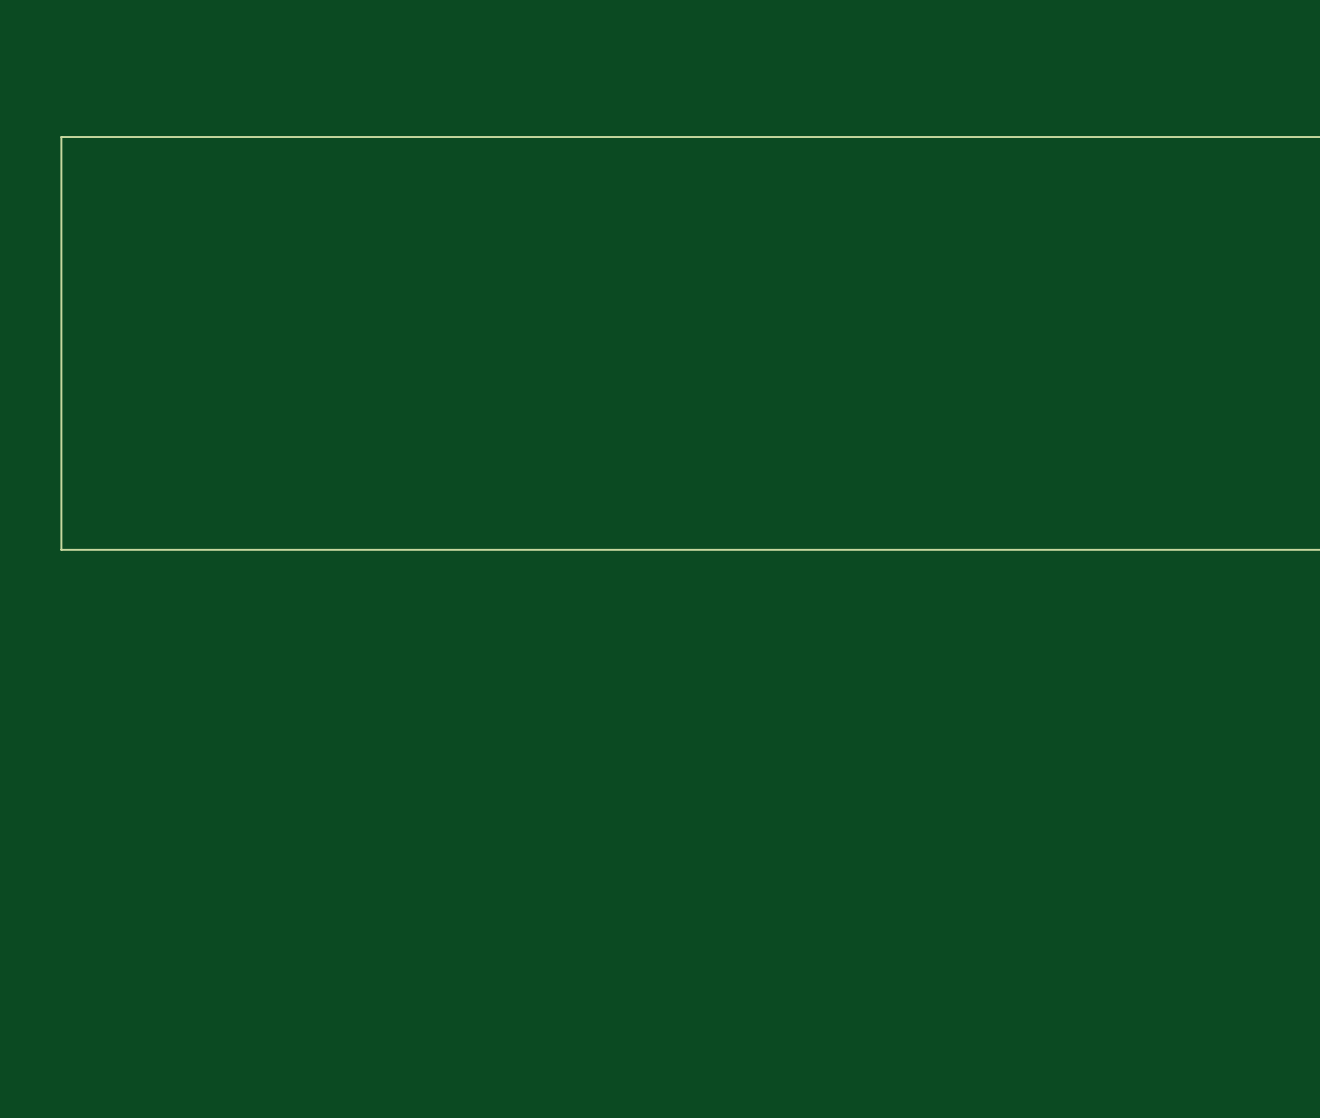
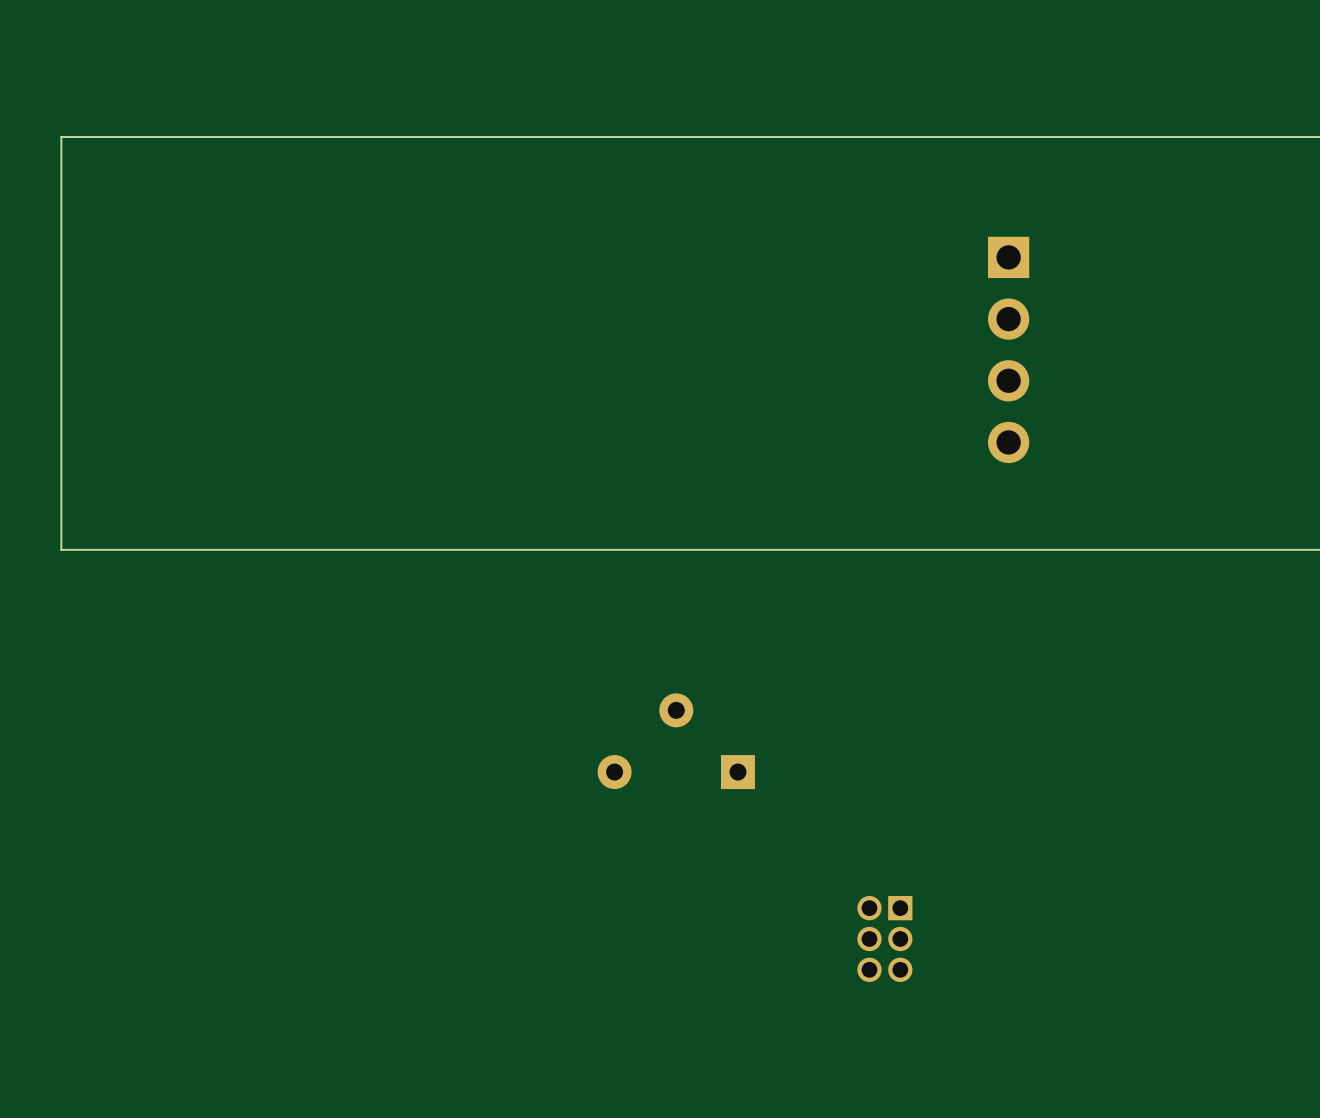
part: none -> (1008, 349)
part: none -> (676, 741)
part: none -> (884, 938)

